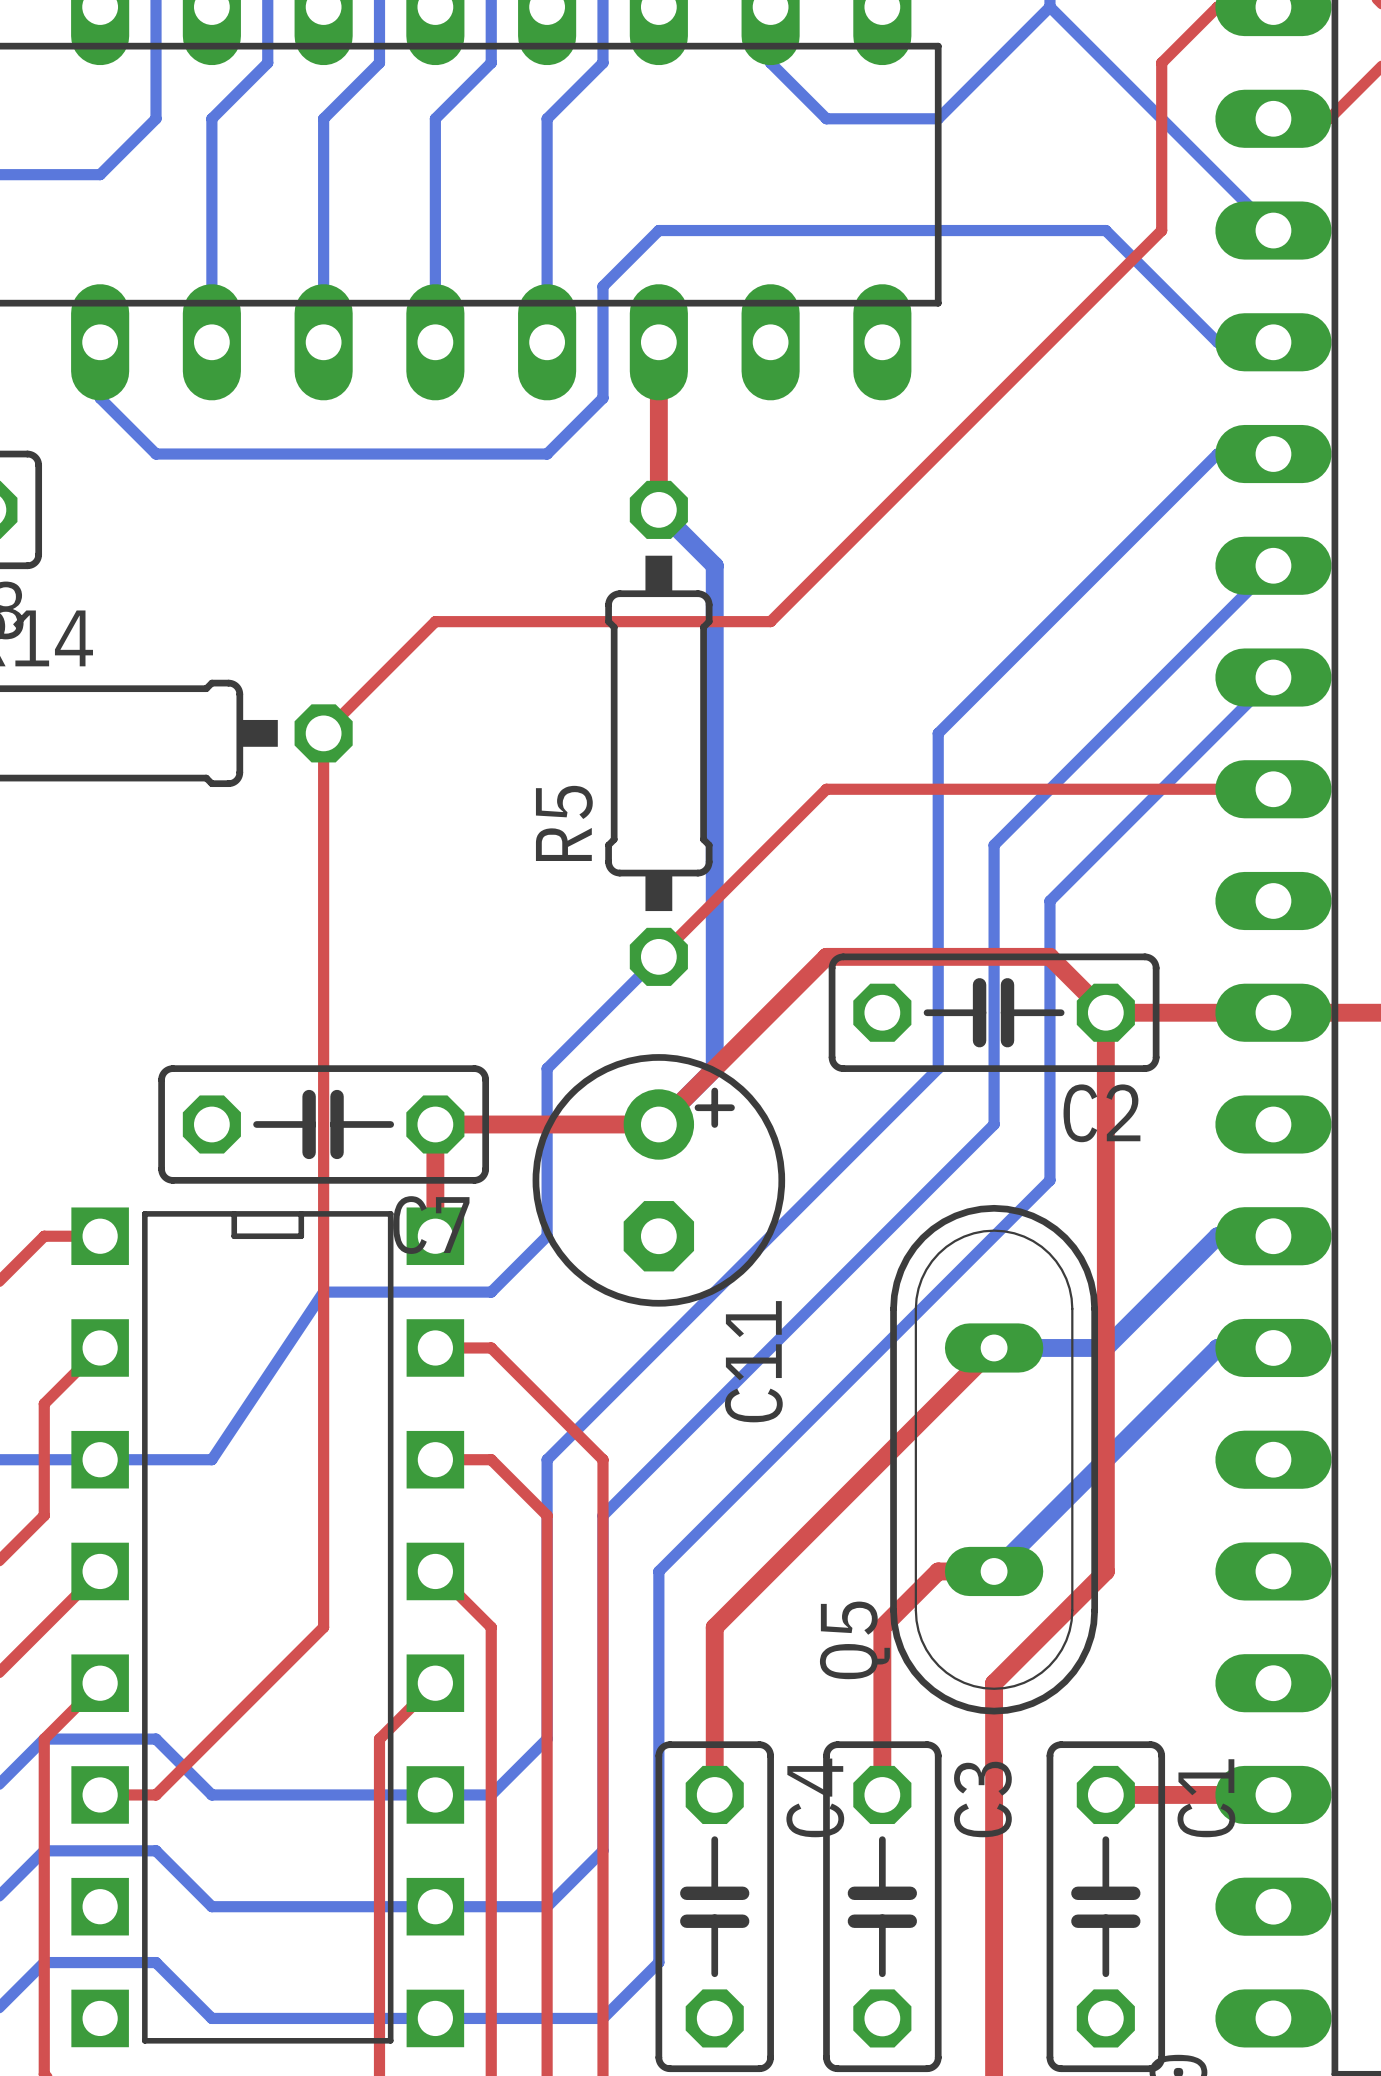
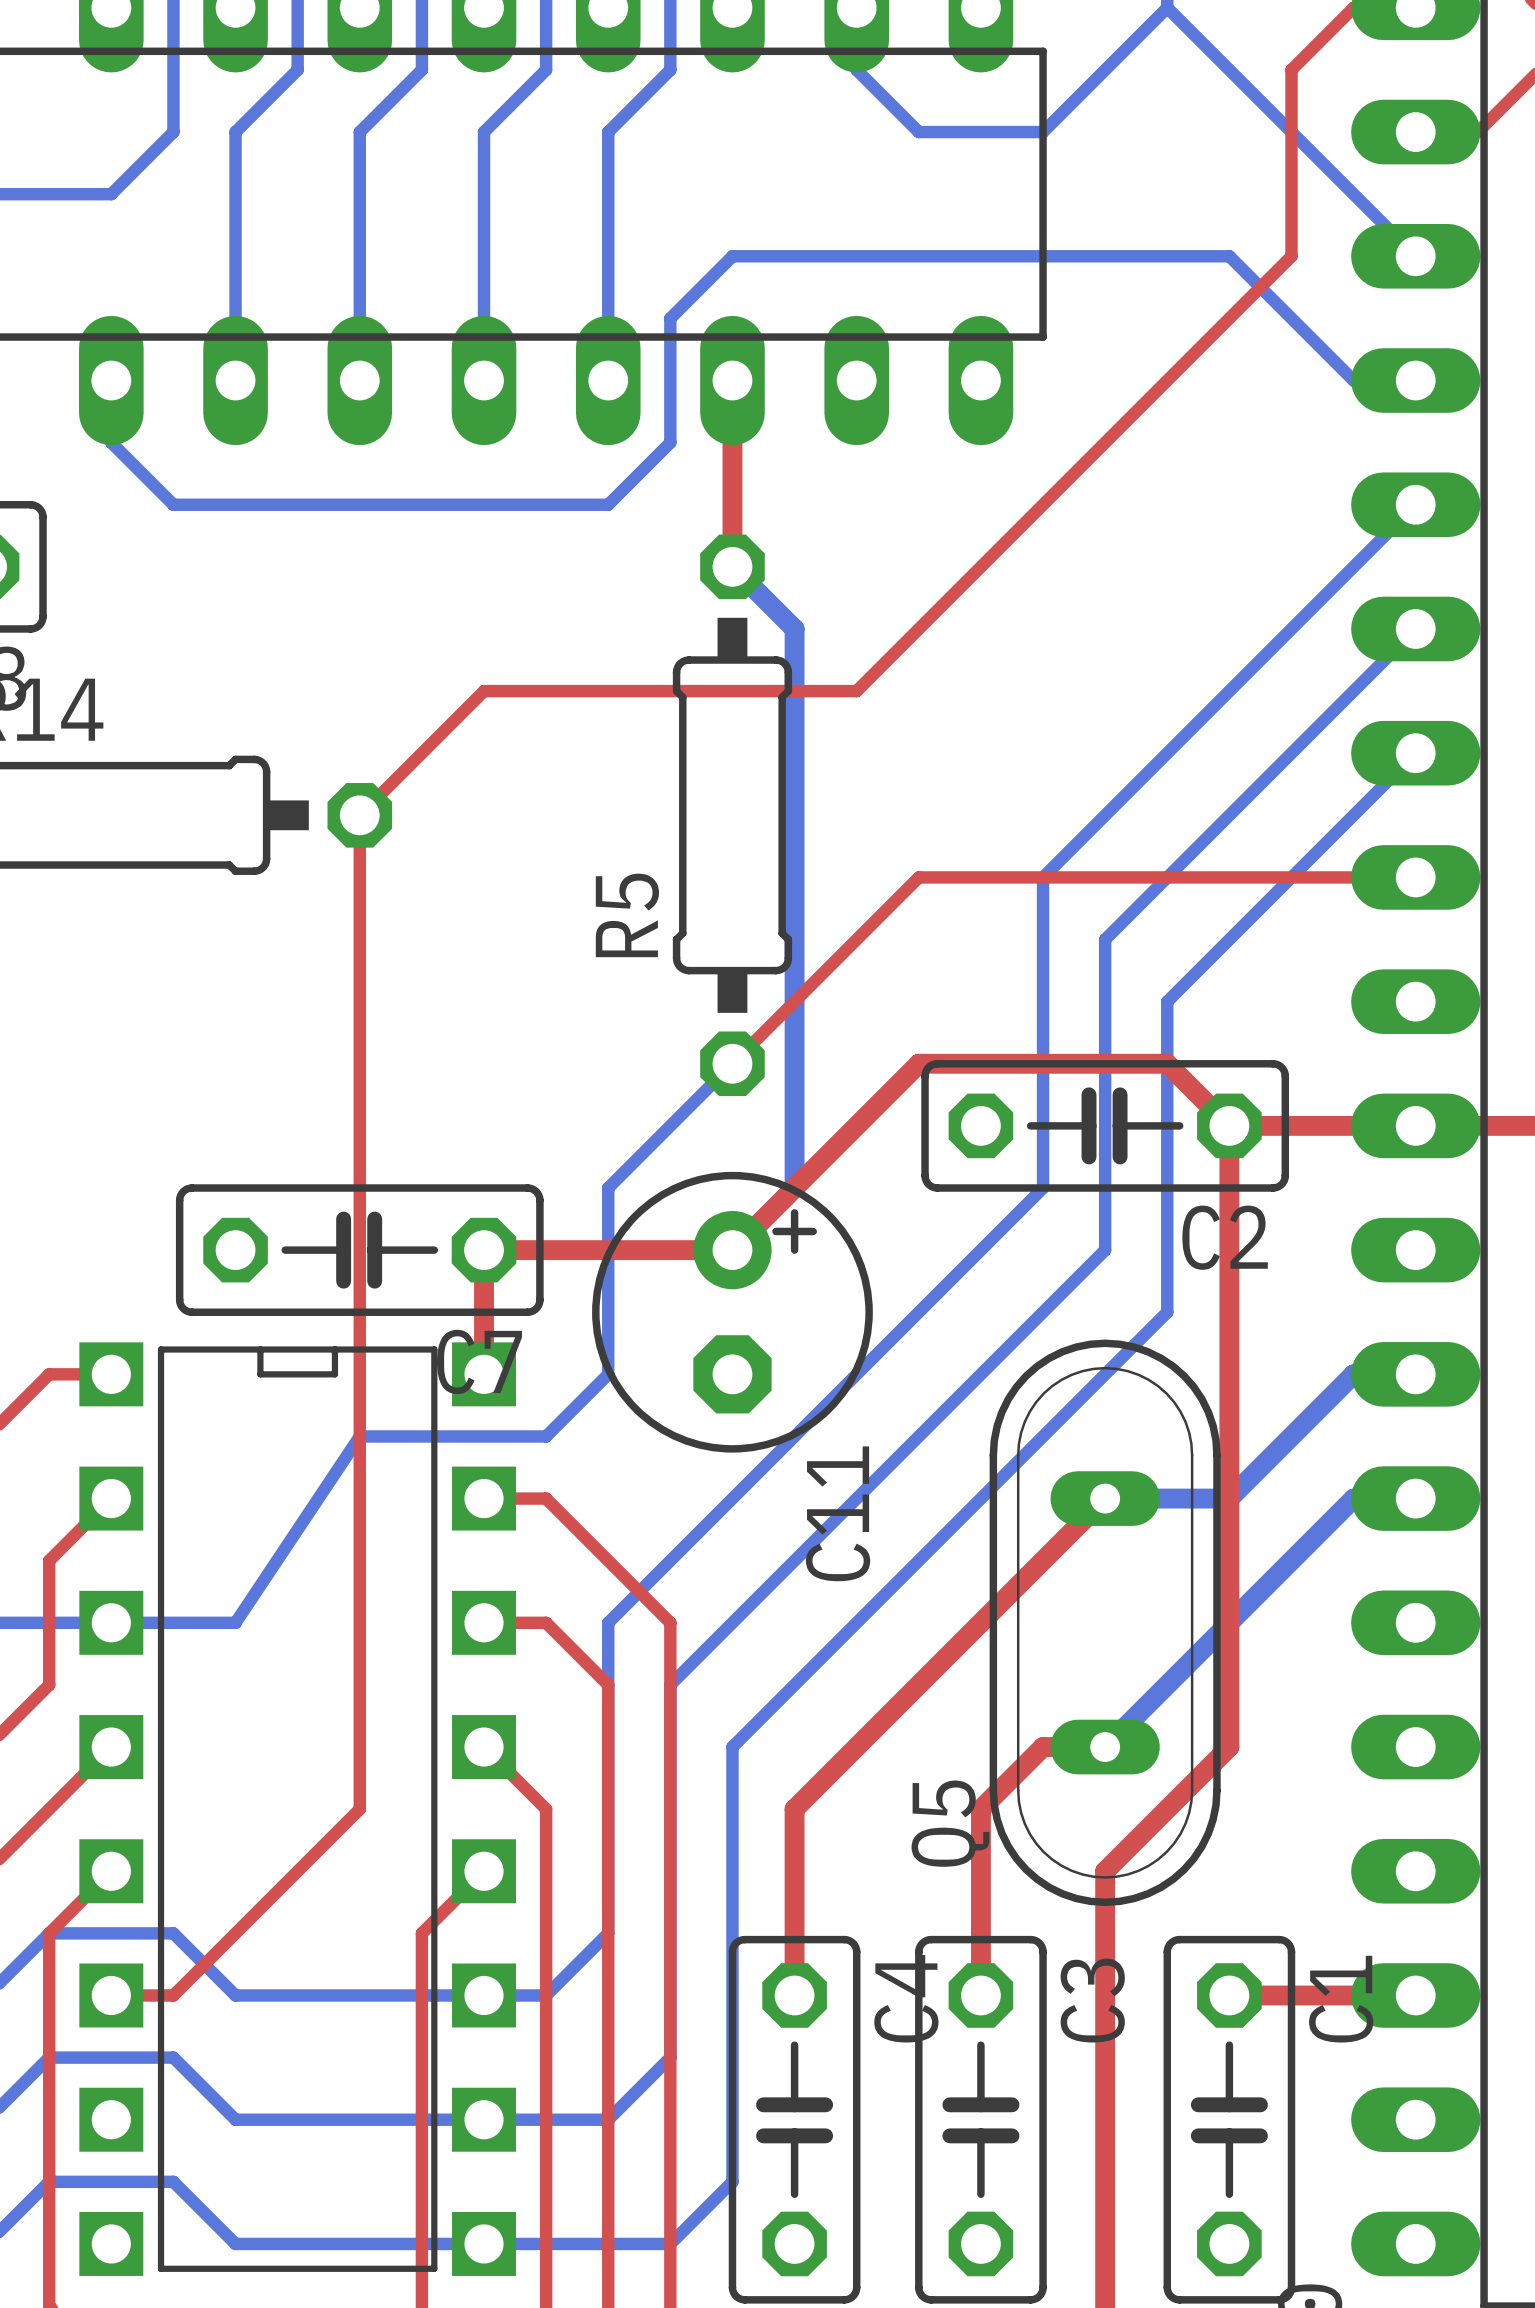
bottom track: (1273, 454) (1217, 454) (938, 733) (938, 789) -> (1415, 504) (1043, 877)

